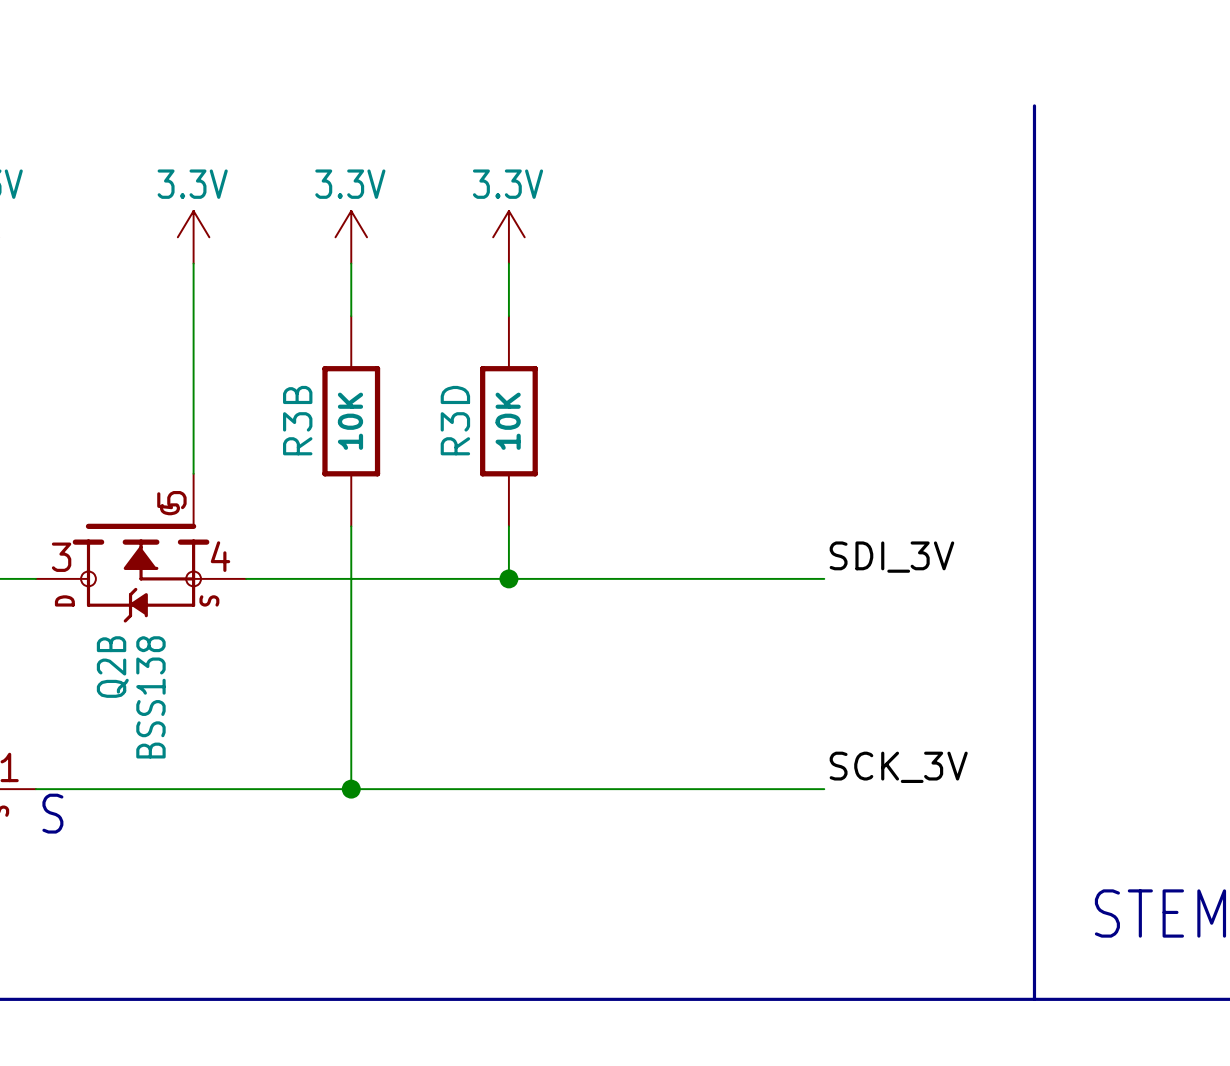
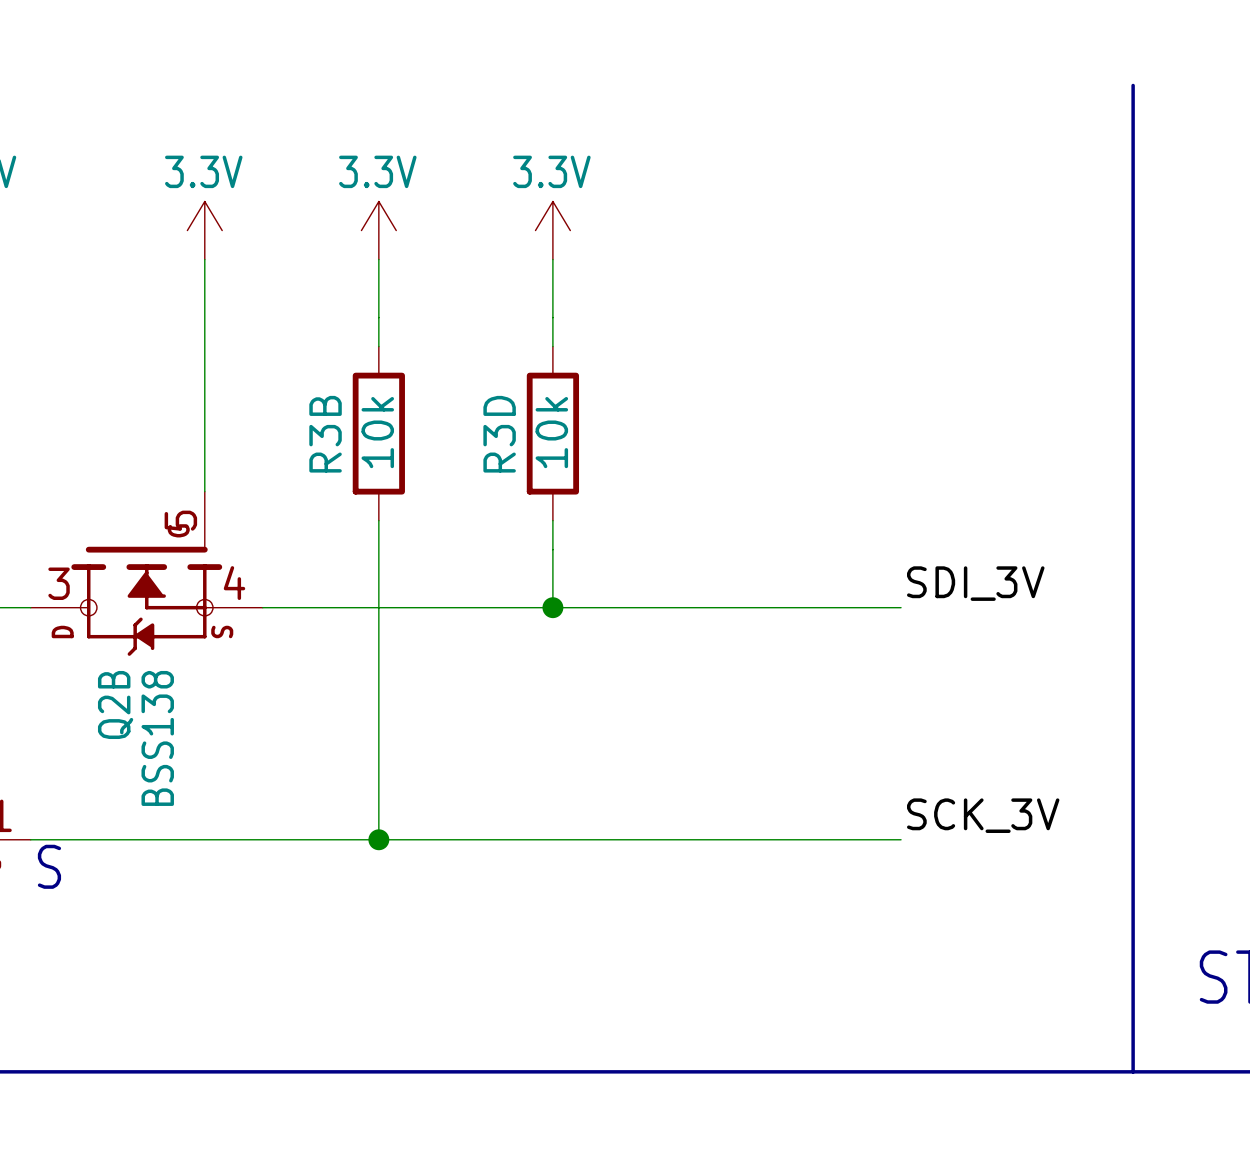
R3B symbol: [322, 316, 381, 527] -> [352, 346, 405, 521]
R3D symbol: [480, 316, 538, 527] -> [526, 346, 580, 521]
R3B value: 10K (350, 421) -> 10k (377, 432)
R3D value: 10K (508, 421) -> 10k (551, 432)

